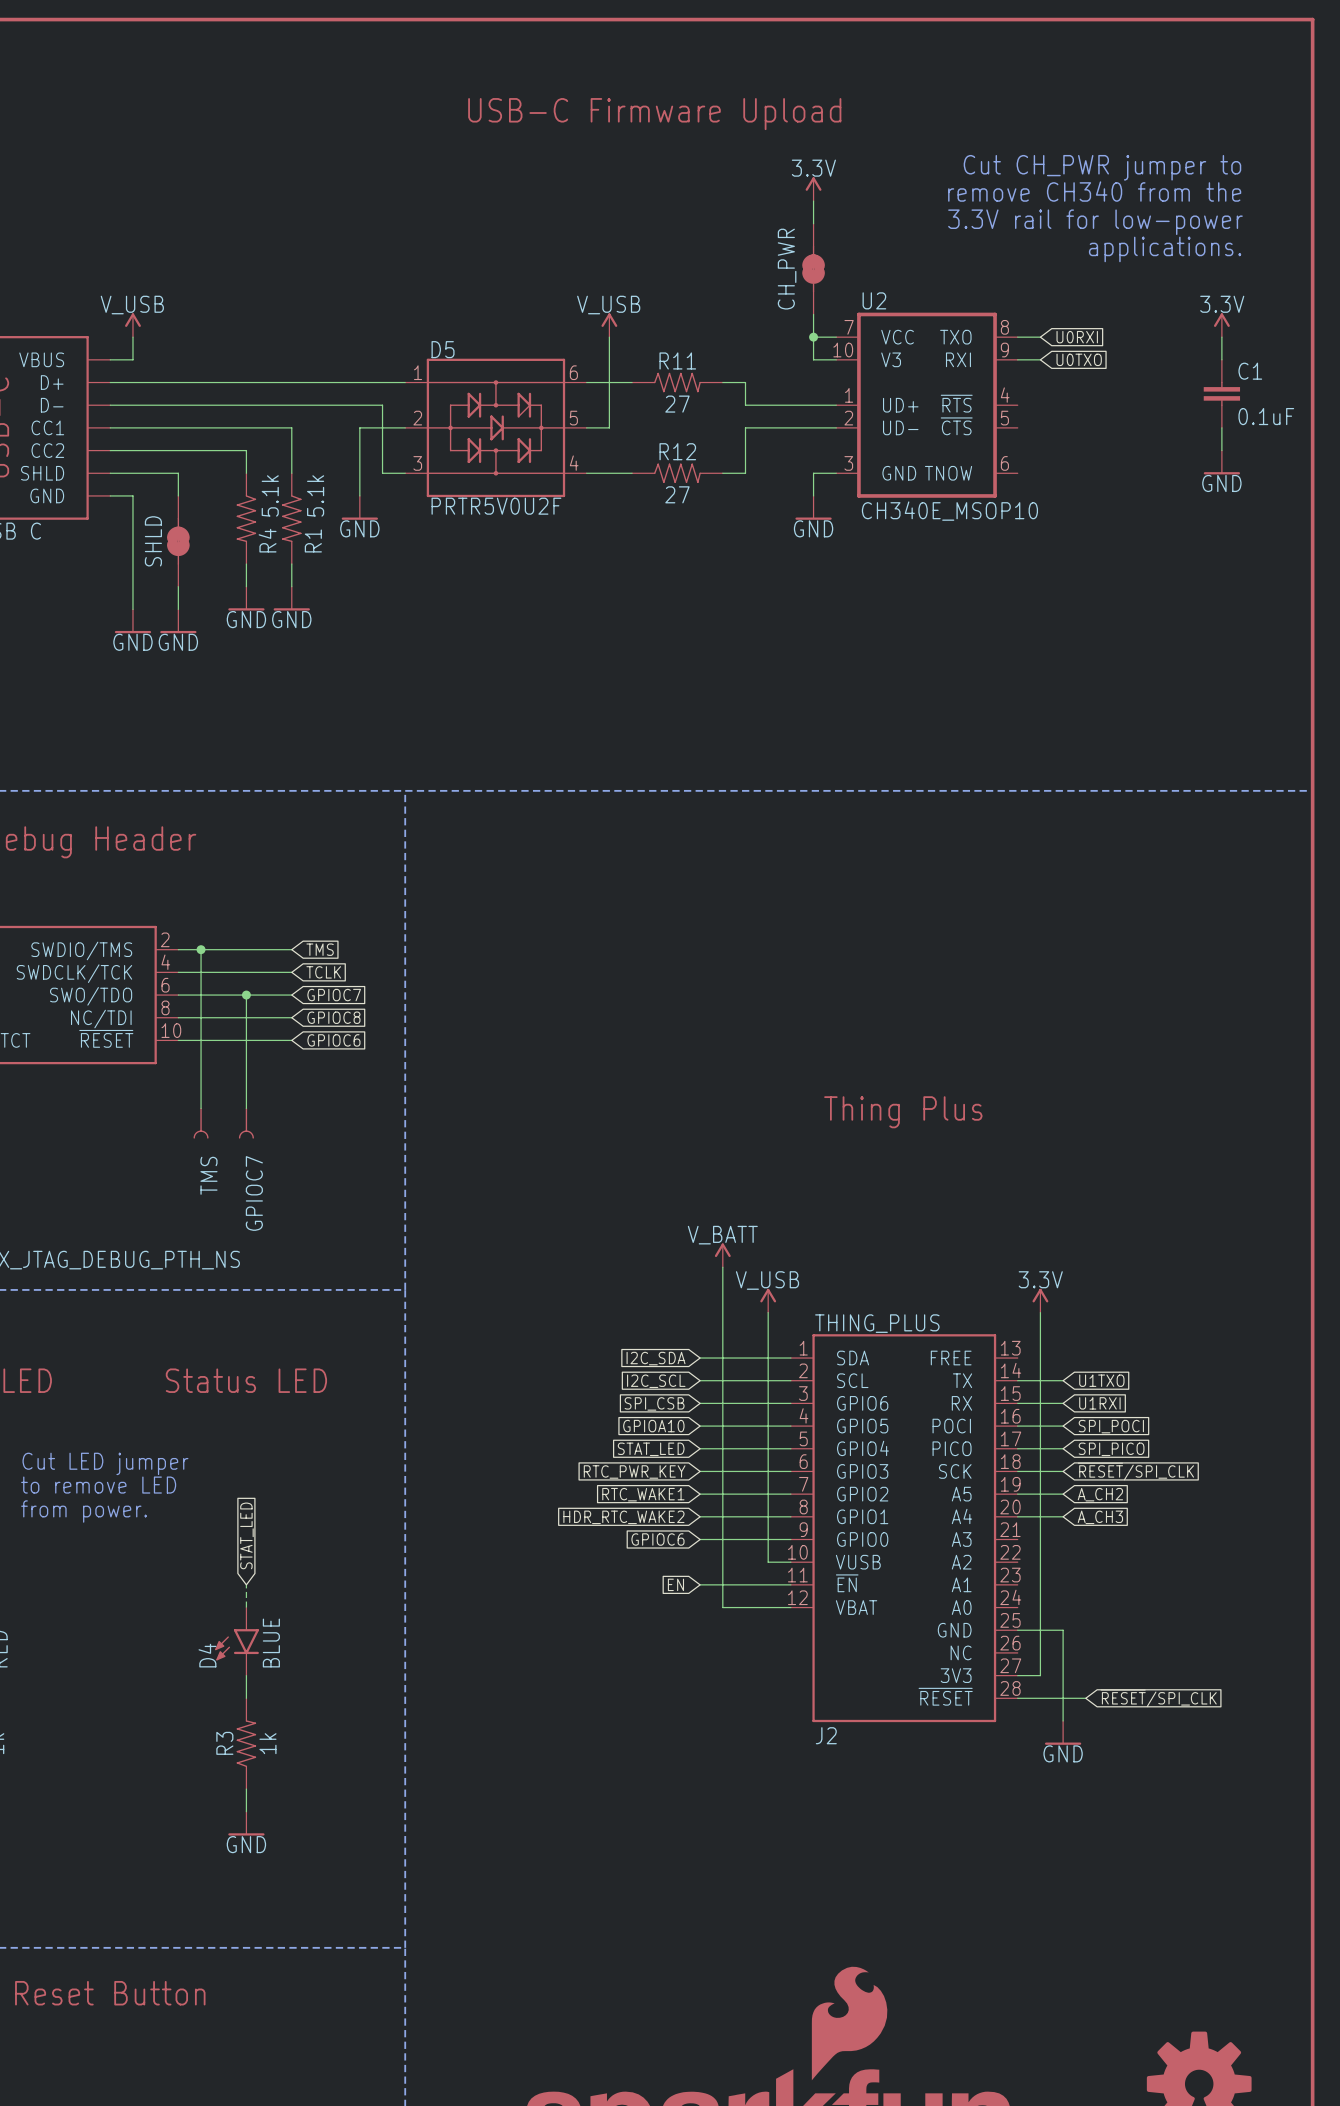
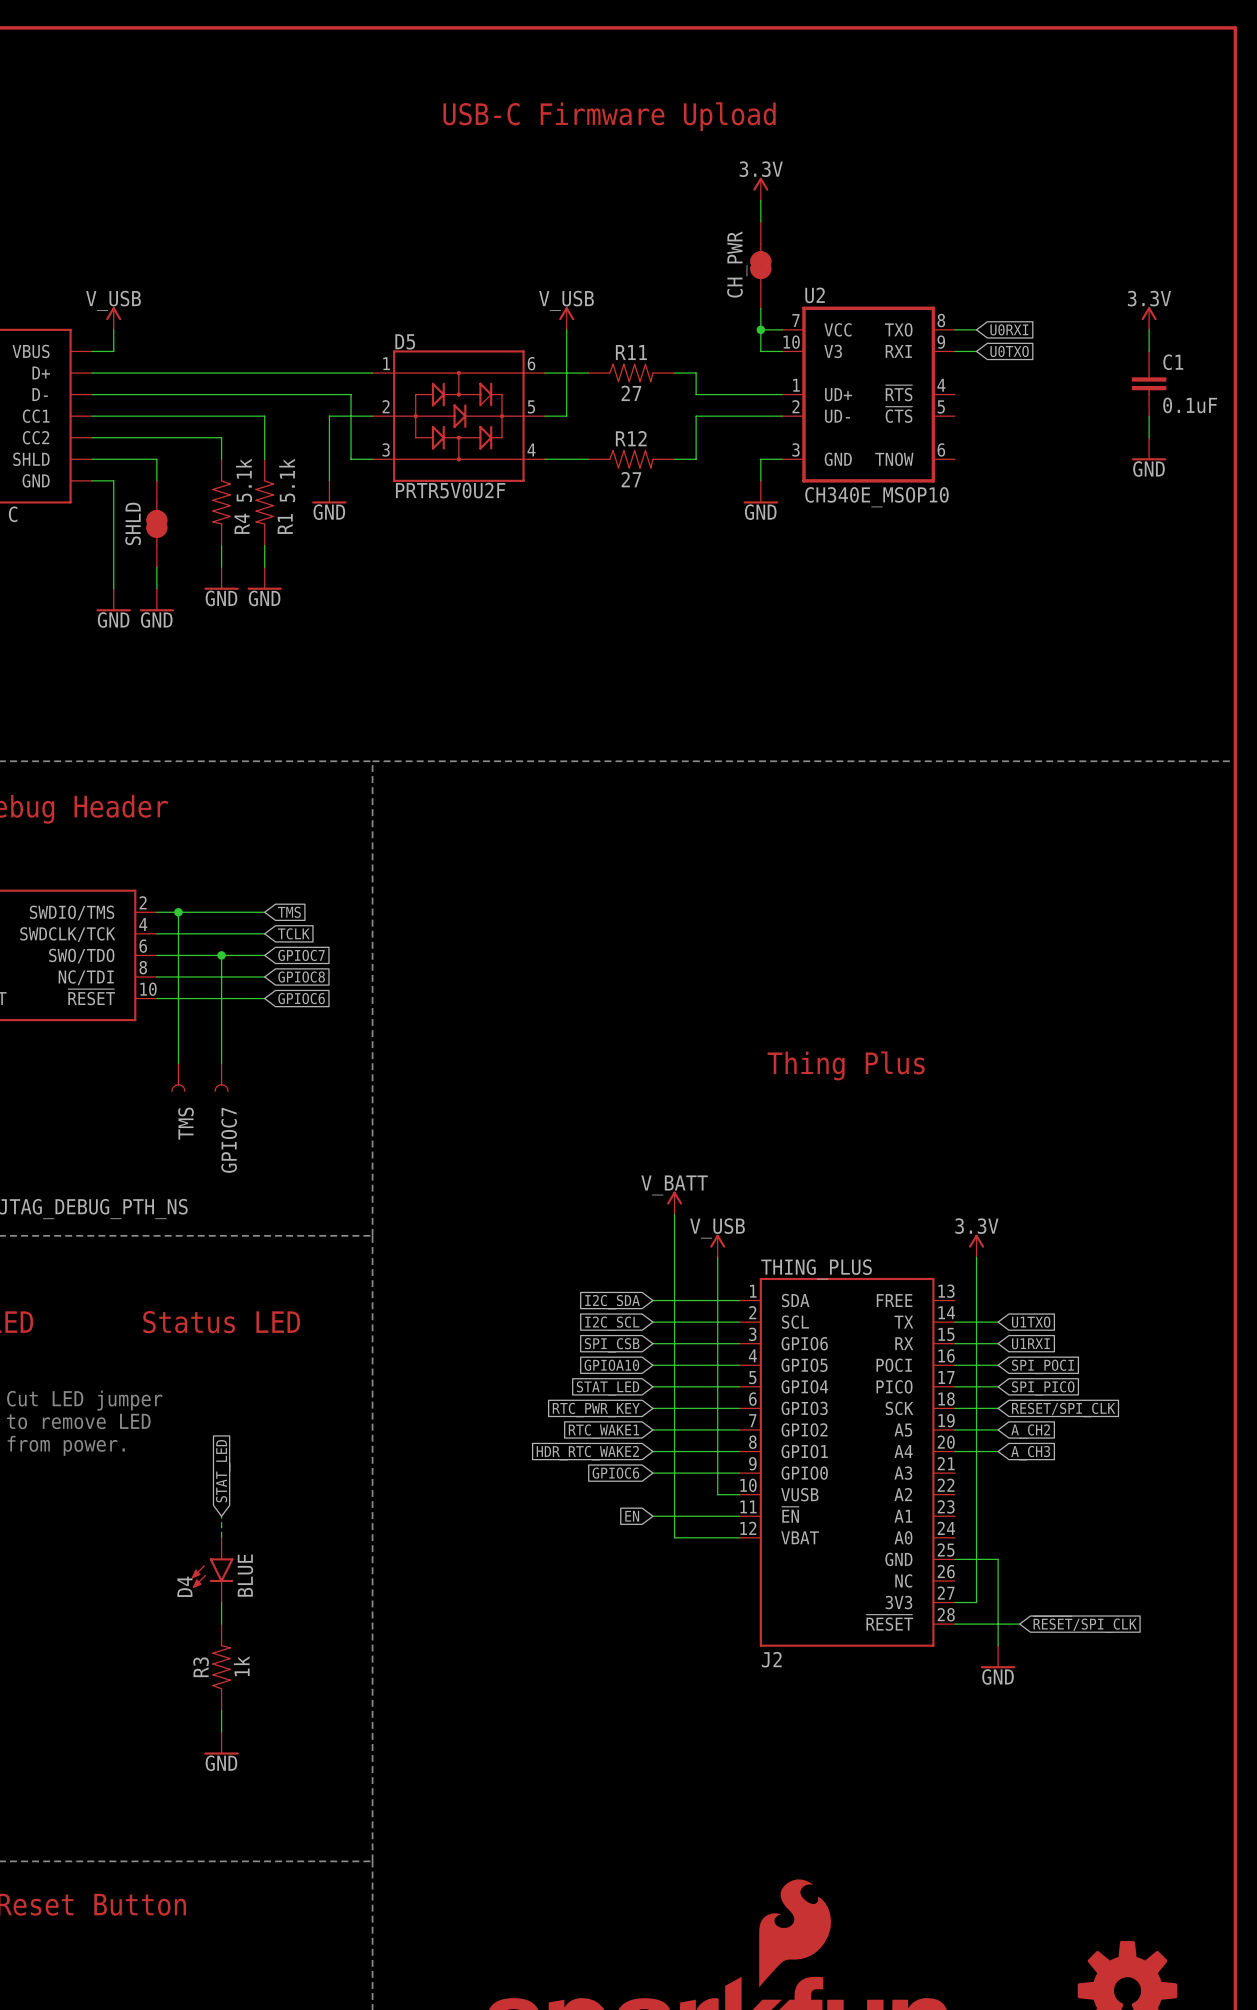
text: Cut CH_PWR jumper to (1102, 167) -> none
text: remove CH340 from the (1094, 191) -> none
text: 3.3V rail for low-power (1095, 222) -> none
text: applications. (1165, 249) -> none

